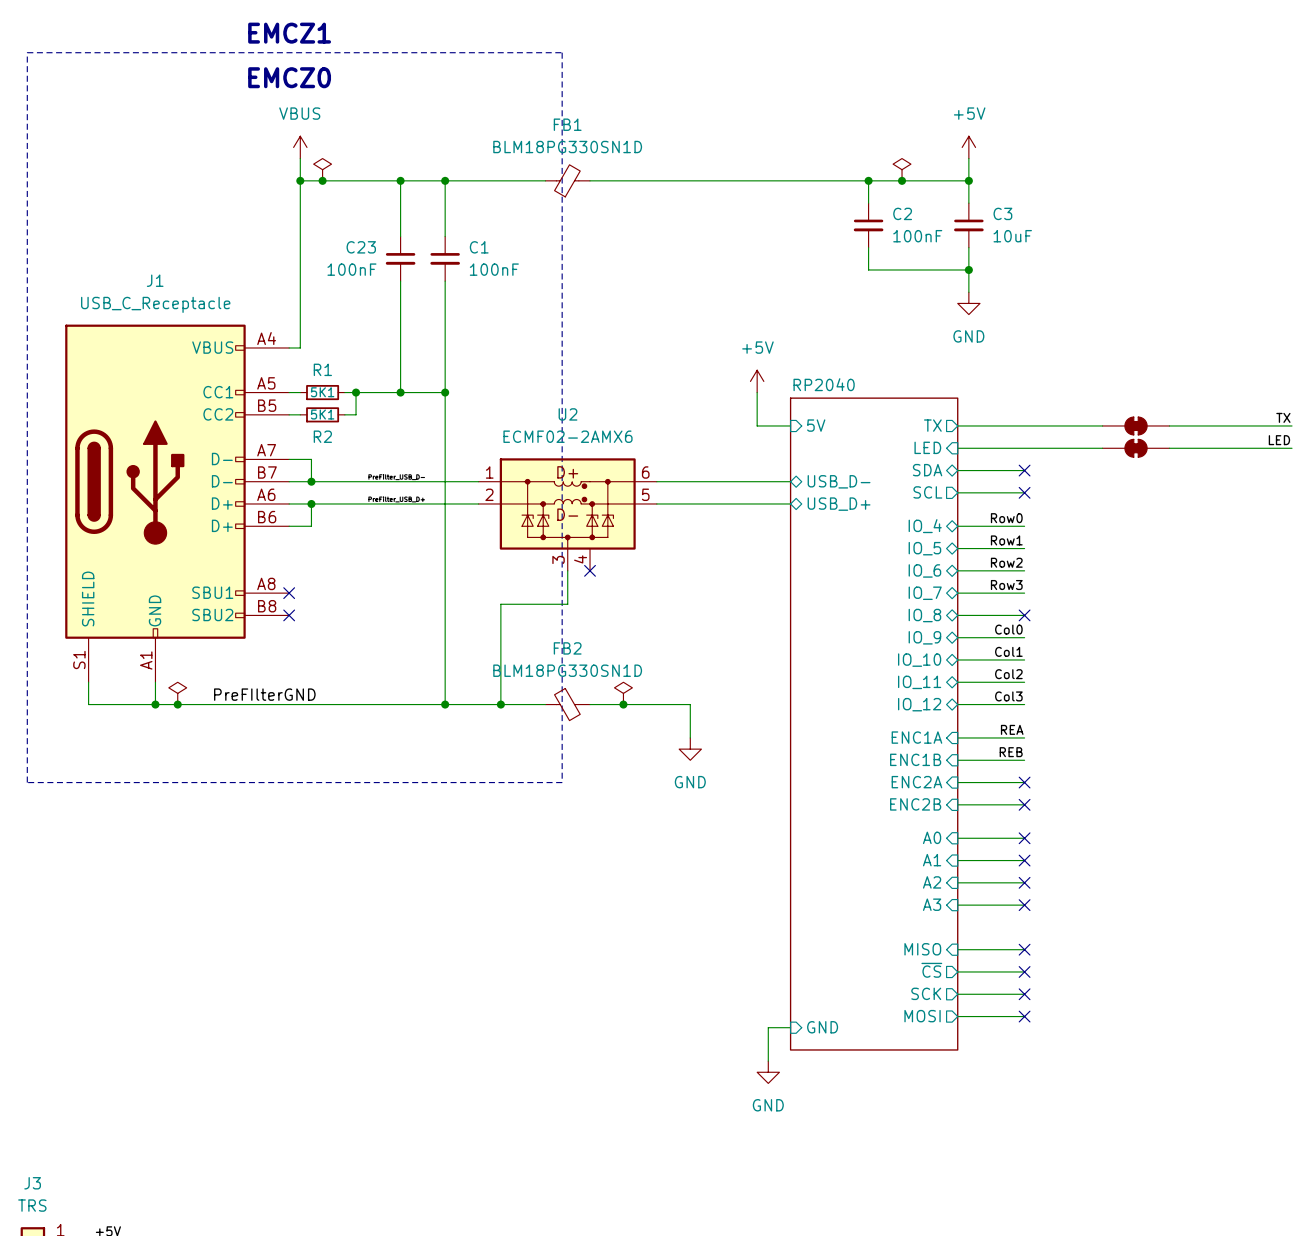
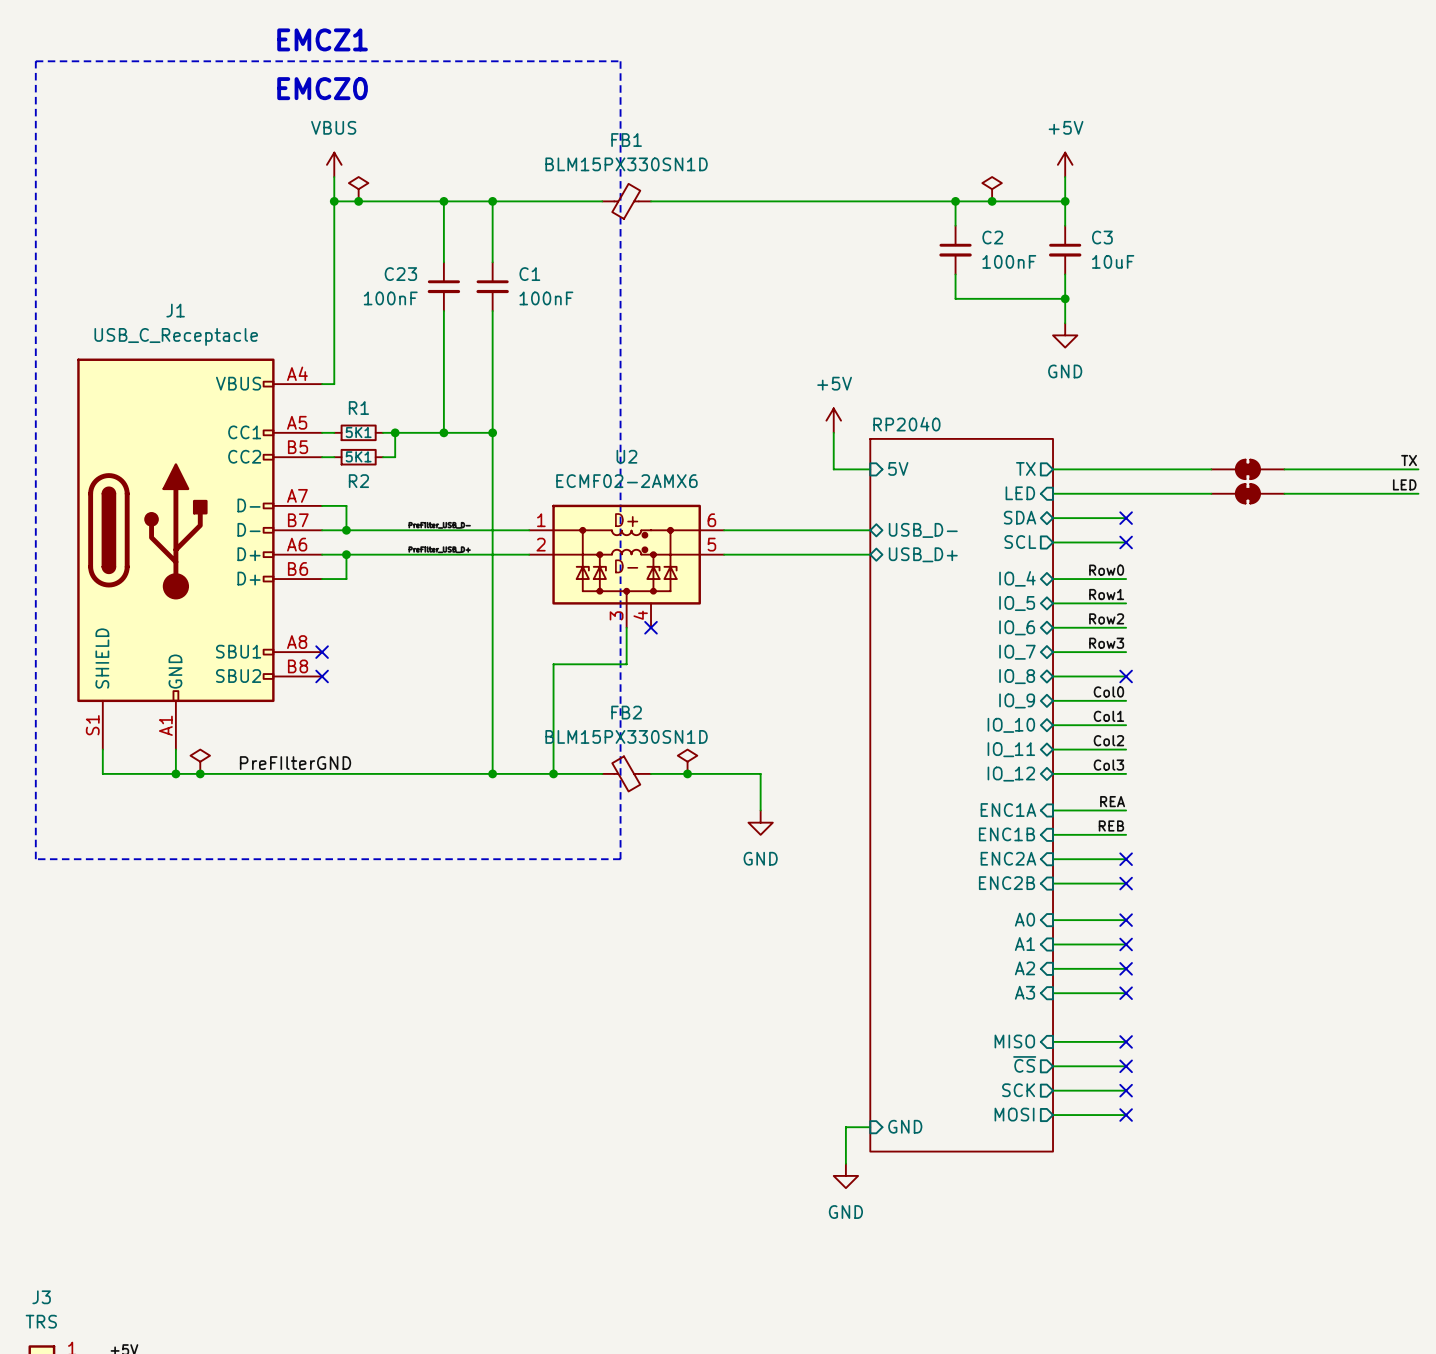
FB1 value: BLM18PG330SN1D (567, 147) -> BLM15PX330SN1D (626, 164)
FB2 value: BLM18PG330SN1D (567, 670) -> BLM15PX330SN1D (626, 736)

